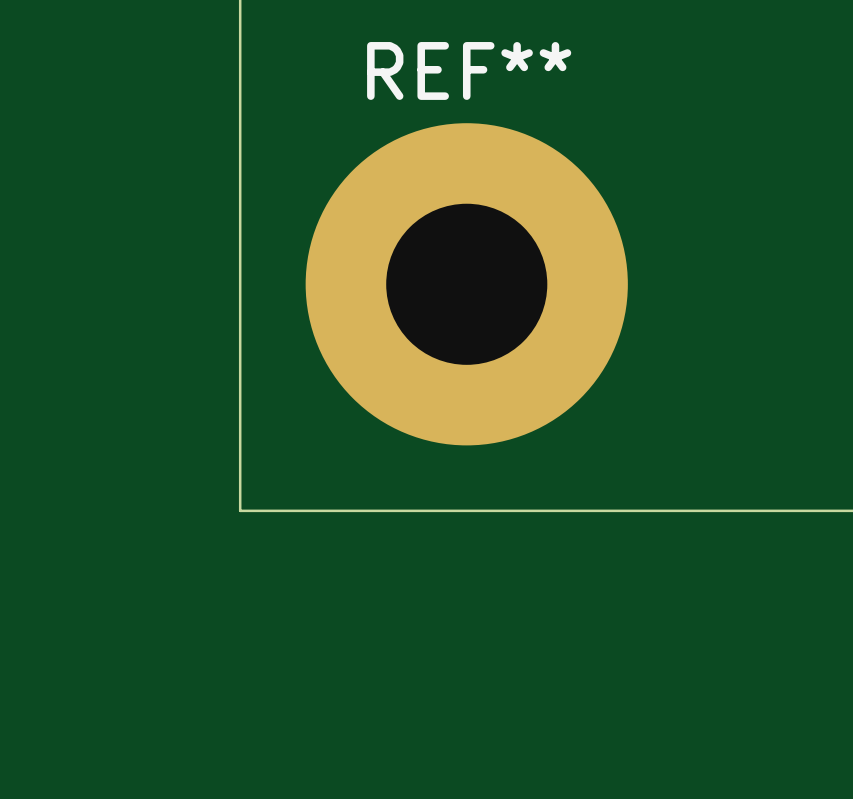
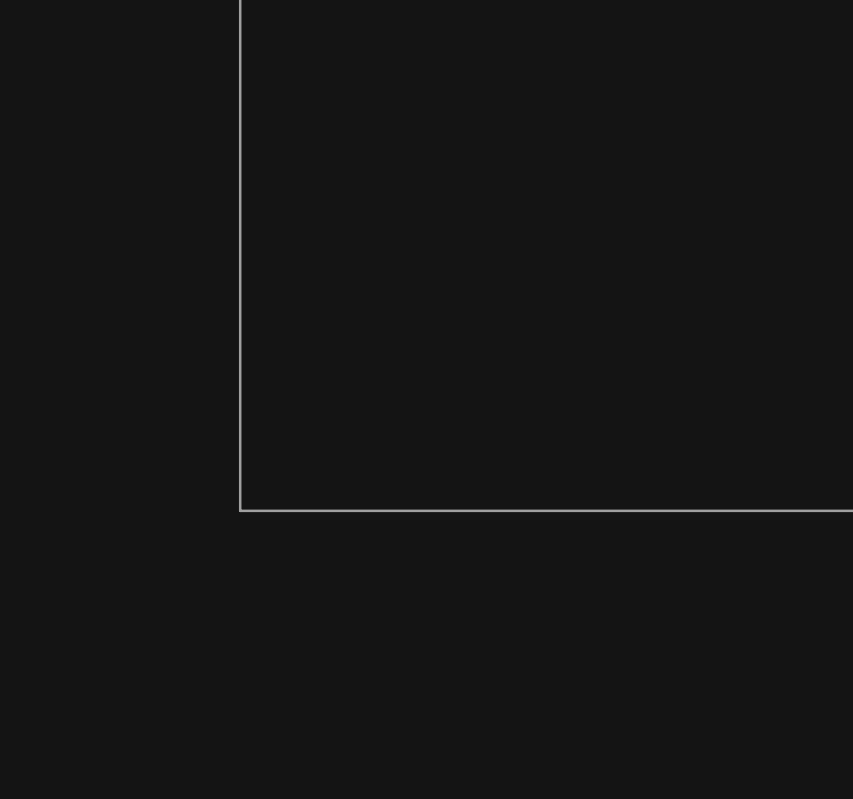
REF**: (466, 284) -> none

